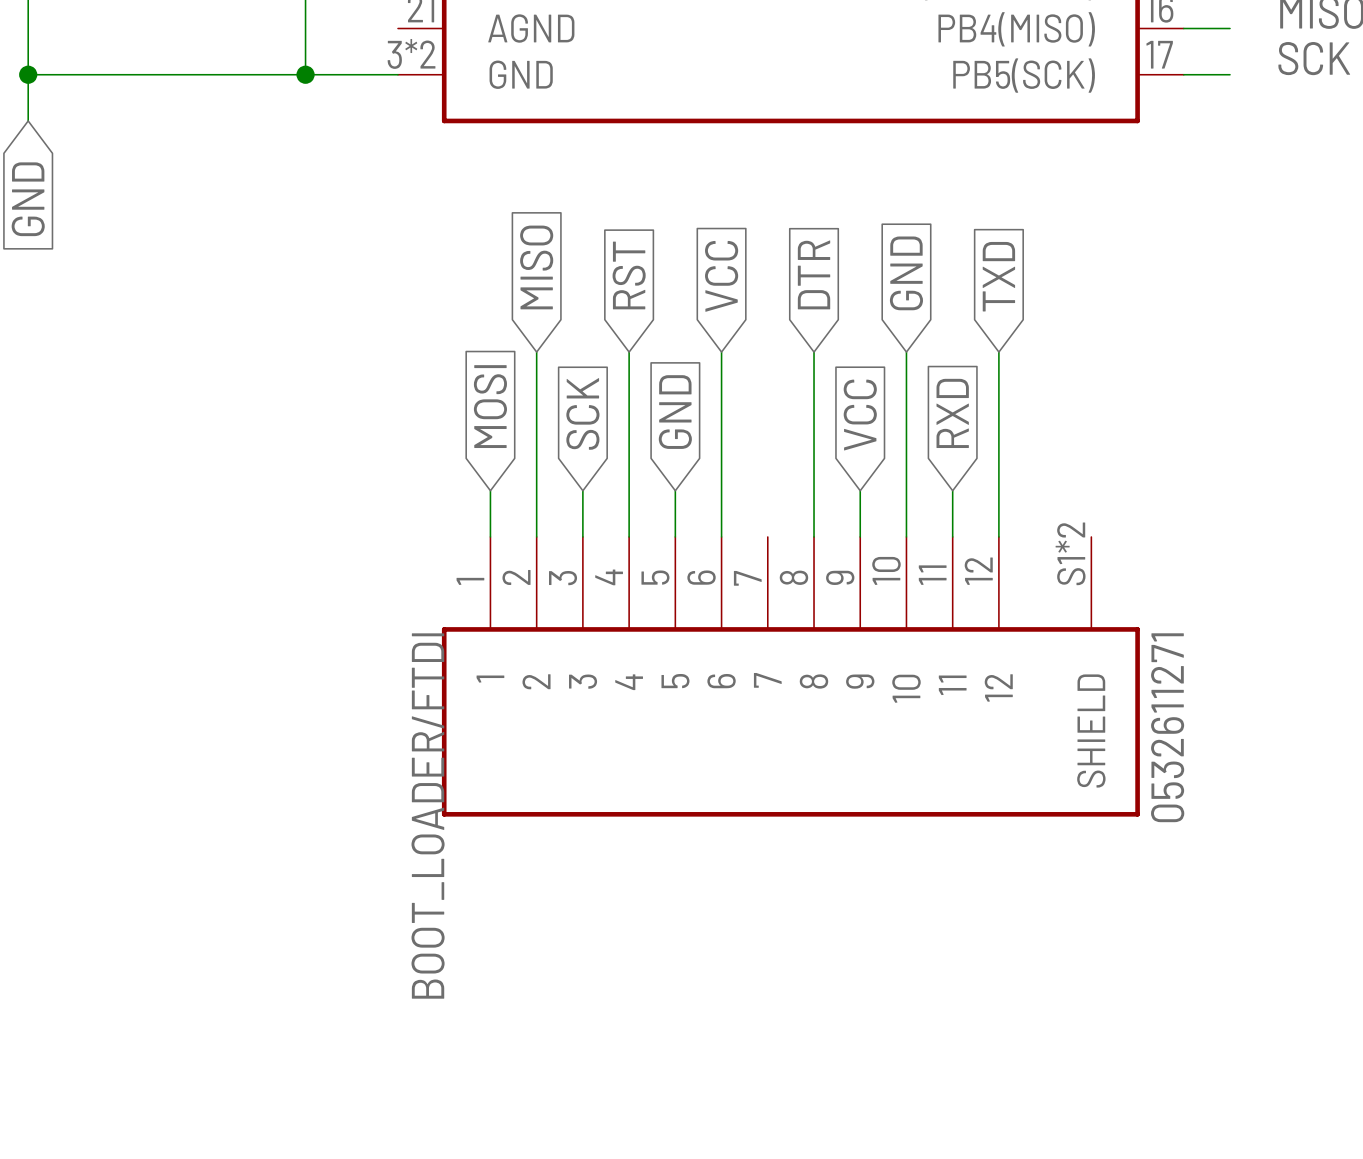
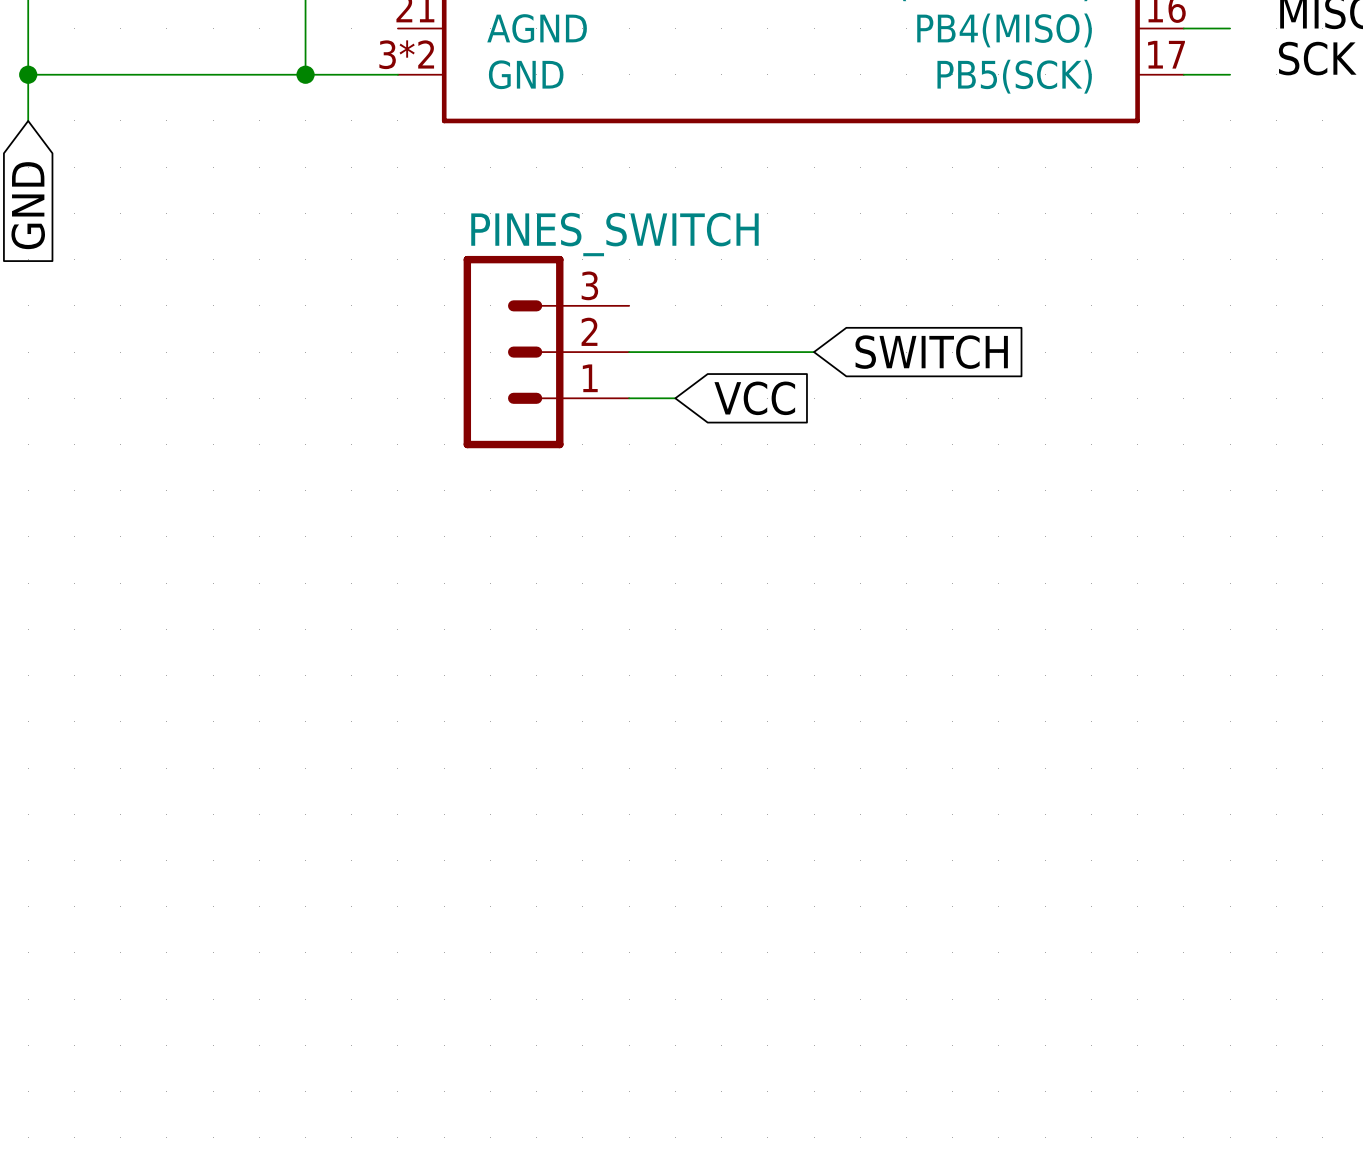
global label: MISO (536, 267) -> none
global label: GND (906, 273) -> none
global label: DTR (814, 274) -> SWITCH (931, 352)
global label: RST (629, 275) -> none
global label rotation: 0° (721, 276) -> 90° clockwise (754, 398)
global label: TXD (998, 276) -> none
wire: (536, 352) (536, 536) -> none
PINES_SWITCH: none -> (546, 352)
wire: (629, 352) (629, 536) -> (629, 352) (814, 352)
wire: (721, 352) (721, 536) -> none
wire: (814, 352) (814, 536) -> none
wire: (906, 352) (906, 536) -> none
wire: (998, 352) (998, 536) -> none
wire: none -> (629, 398) (675, 398)
global label: MOSI (490, 406) -> none
global label: GND (675, 412) -> none
global label: SCK (582, 413) -> none
global label: RXD (952, 413) -> none
global label: VCC (860, 415) -> none
wire: (490, 490) (490, 536) -> none
wire: (582, 490) (582, 536) -> none
wire: (675, 490) (675, 536) -> none
wire: (860, 490) (860, 536) -> none
wire: (952, 490) (952, 536) -> none
BOOT_LOADER/FTDI: 0532611271 (790, 676) -> none

